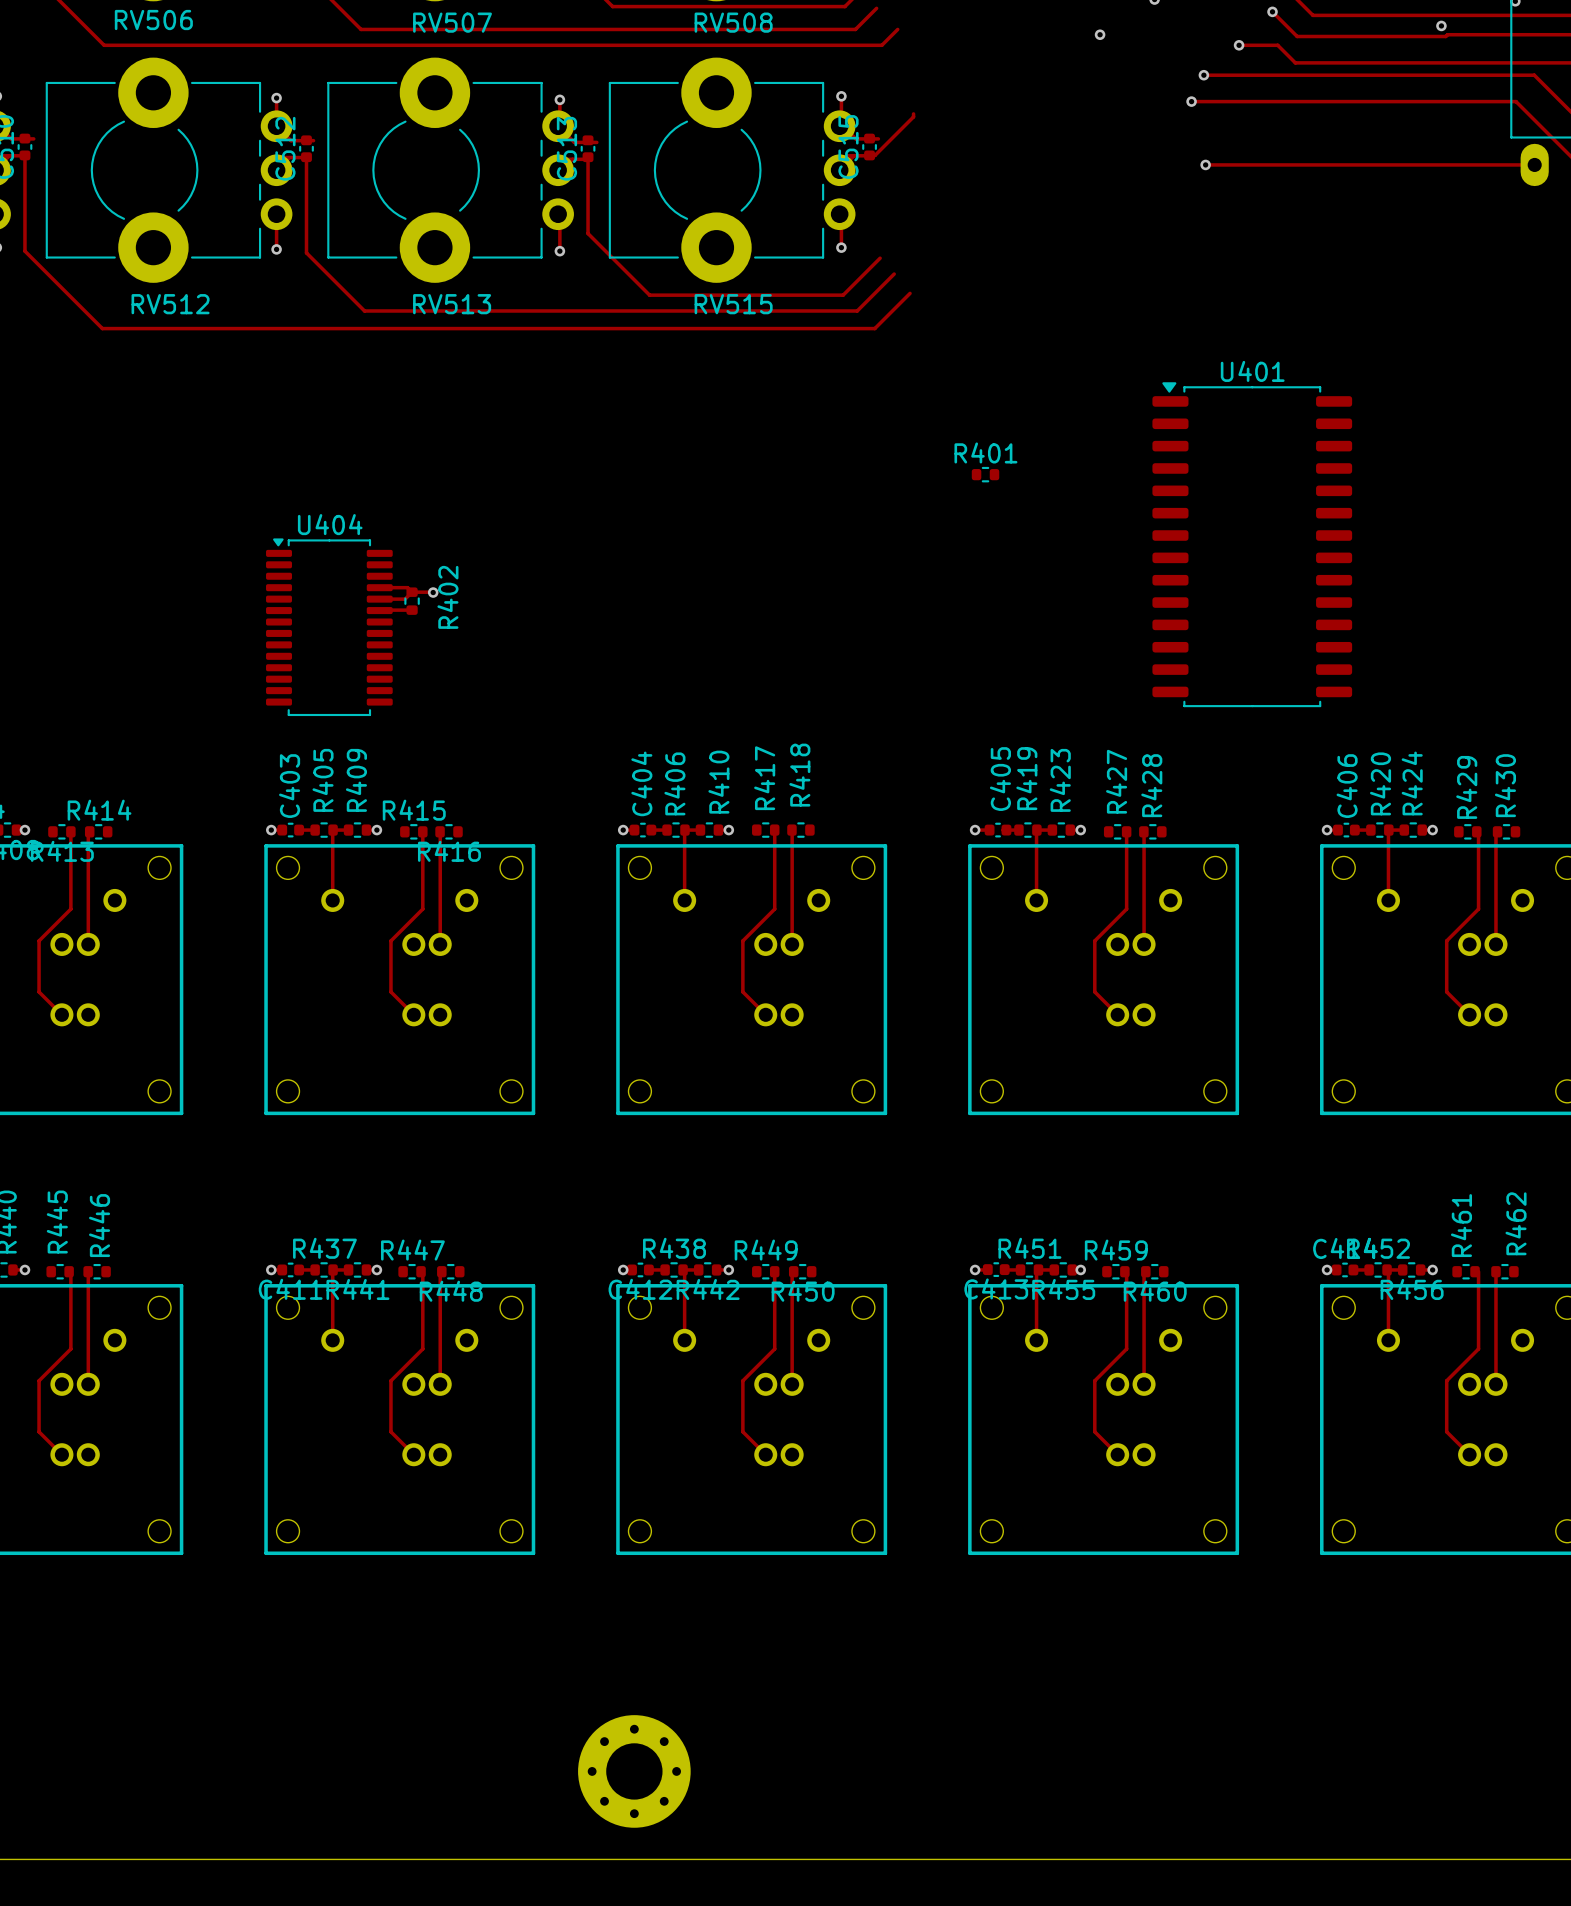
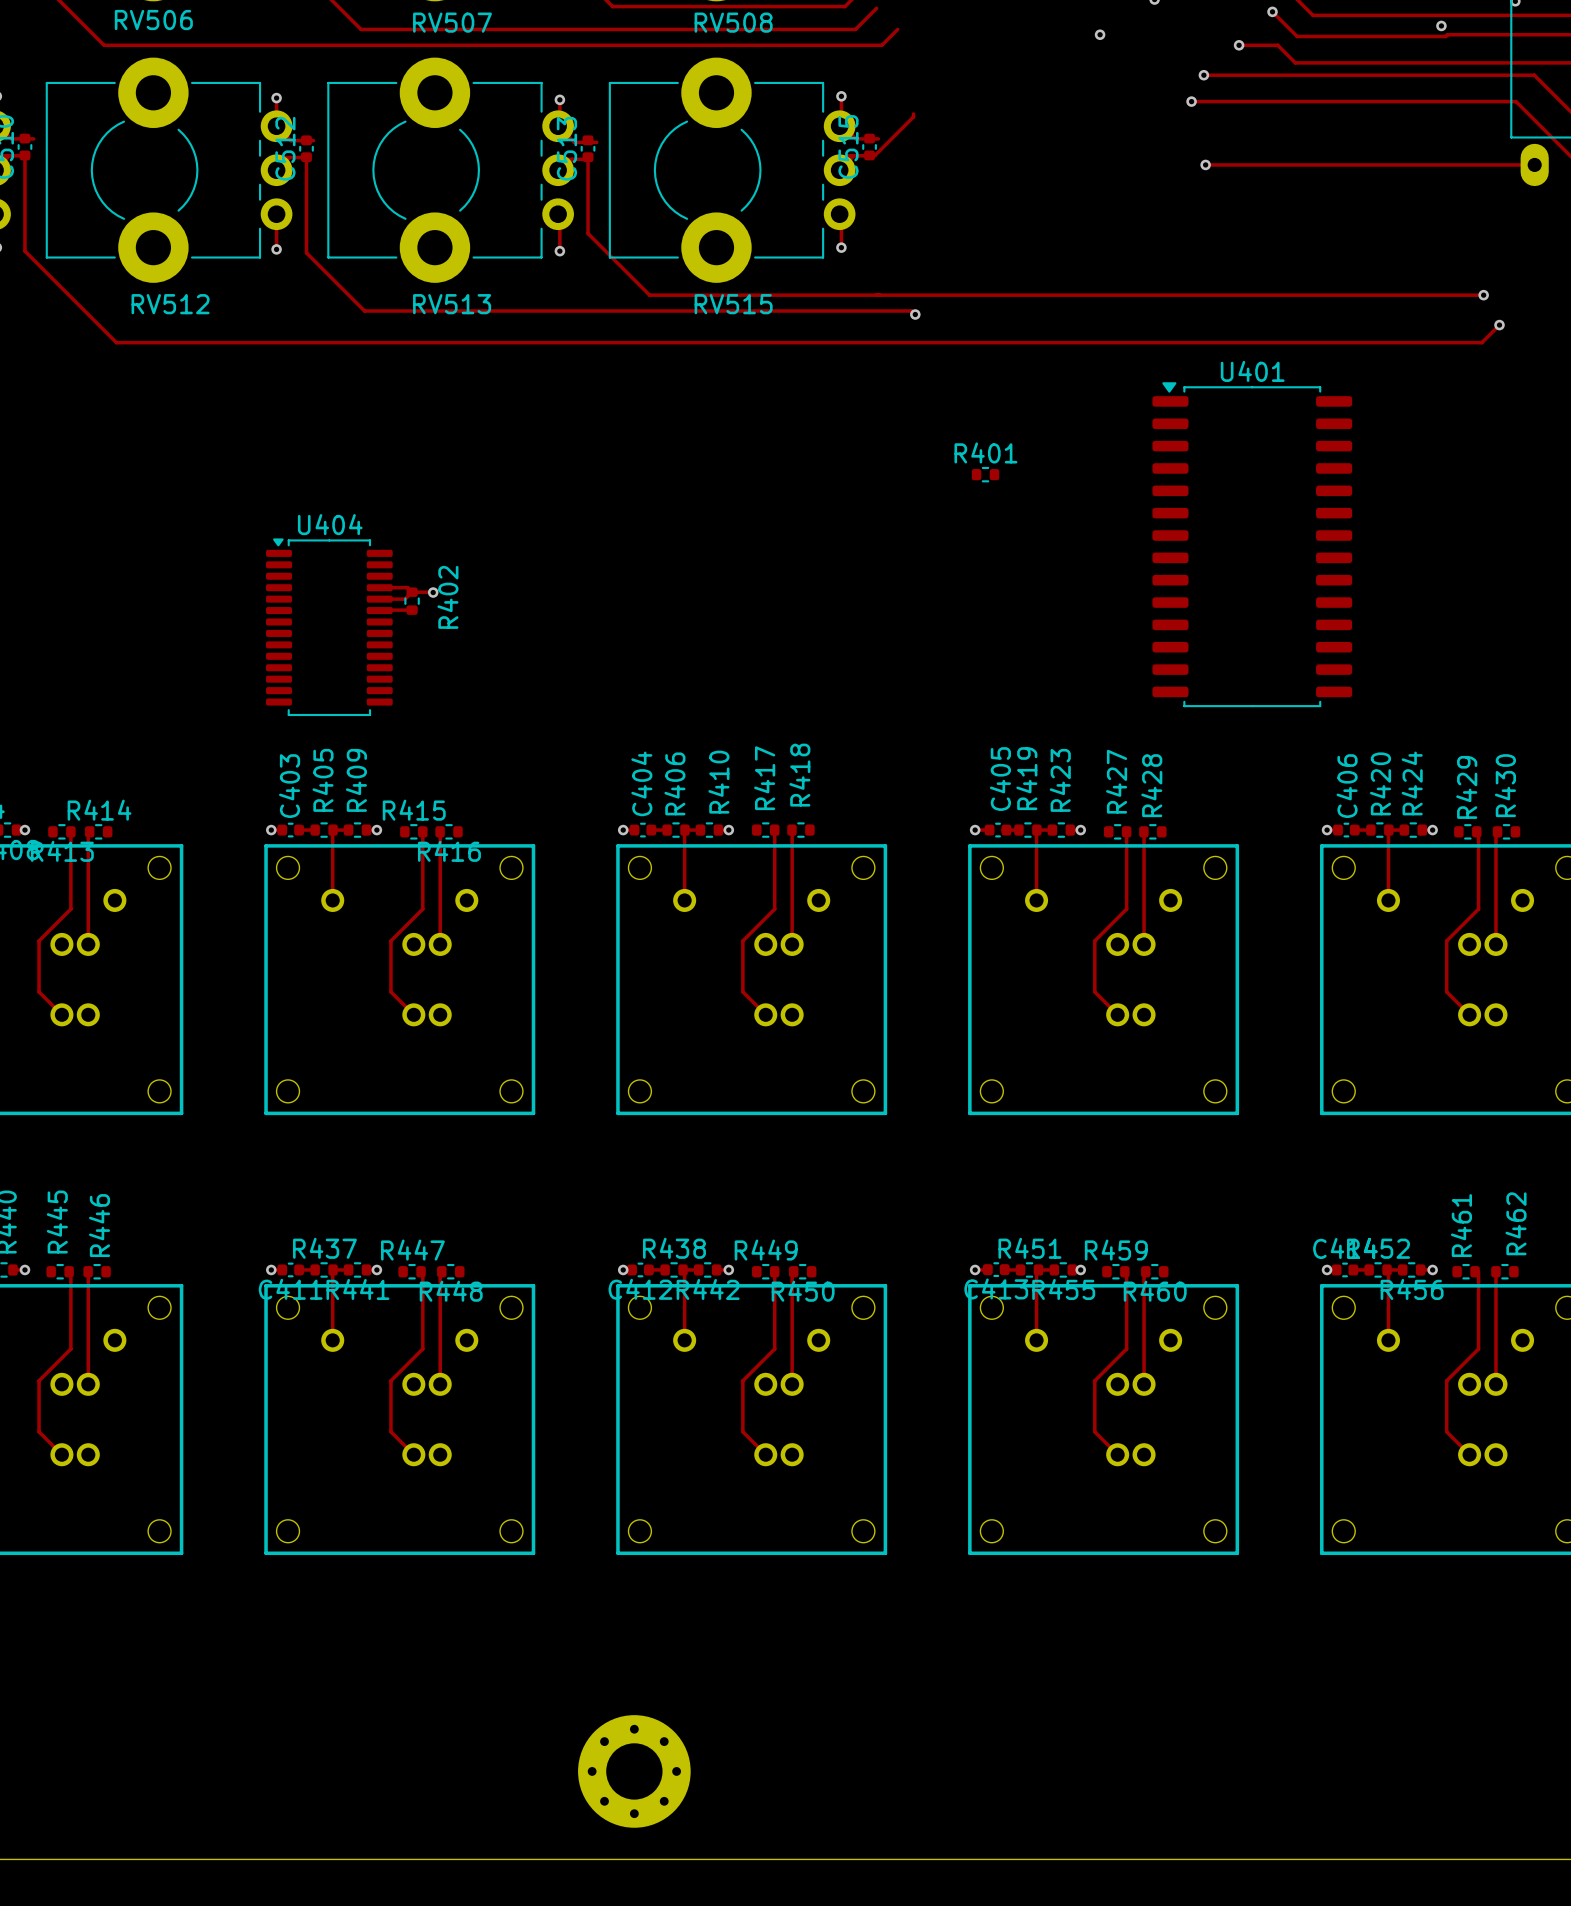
track: (880, 258) (843, 295) -> (1483, 295) (843, 295)
track: (894, 274) (857, 310) -> (915, 314) (911, 310) (857, 310)
track: (910, 293) (874, 328) (102, 328) -> (1499, 325) (1481, 342) (116, 342) (102, 328)
via: none -> (1483, 295)
via: none -> (915, 314)
via: none -> (1499, 325)

